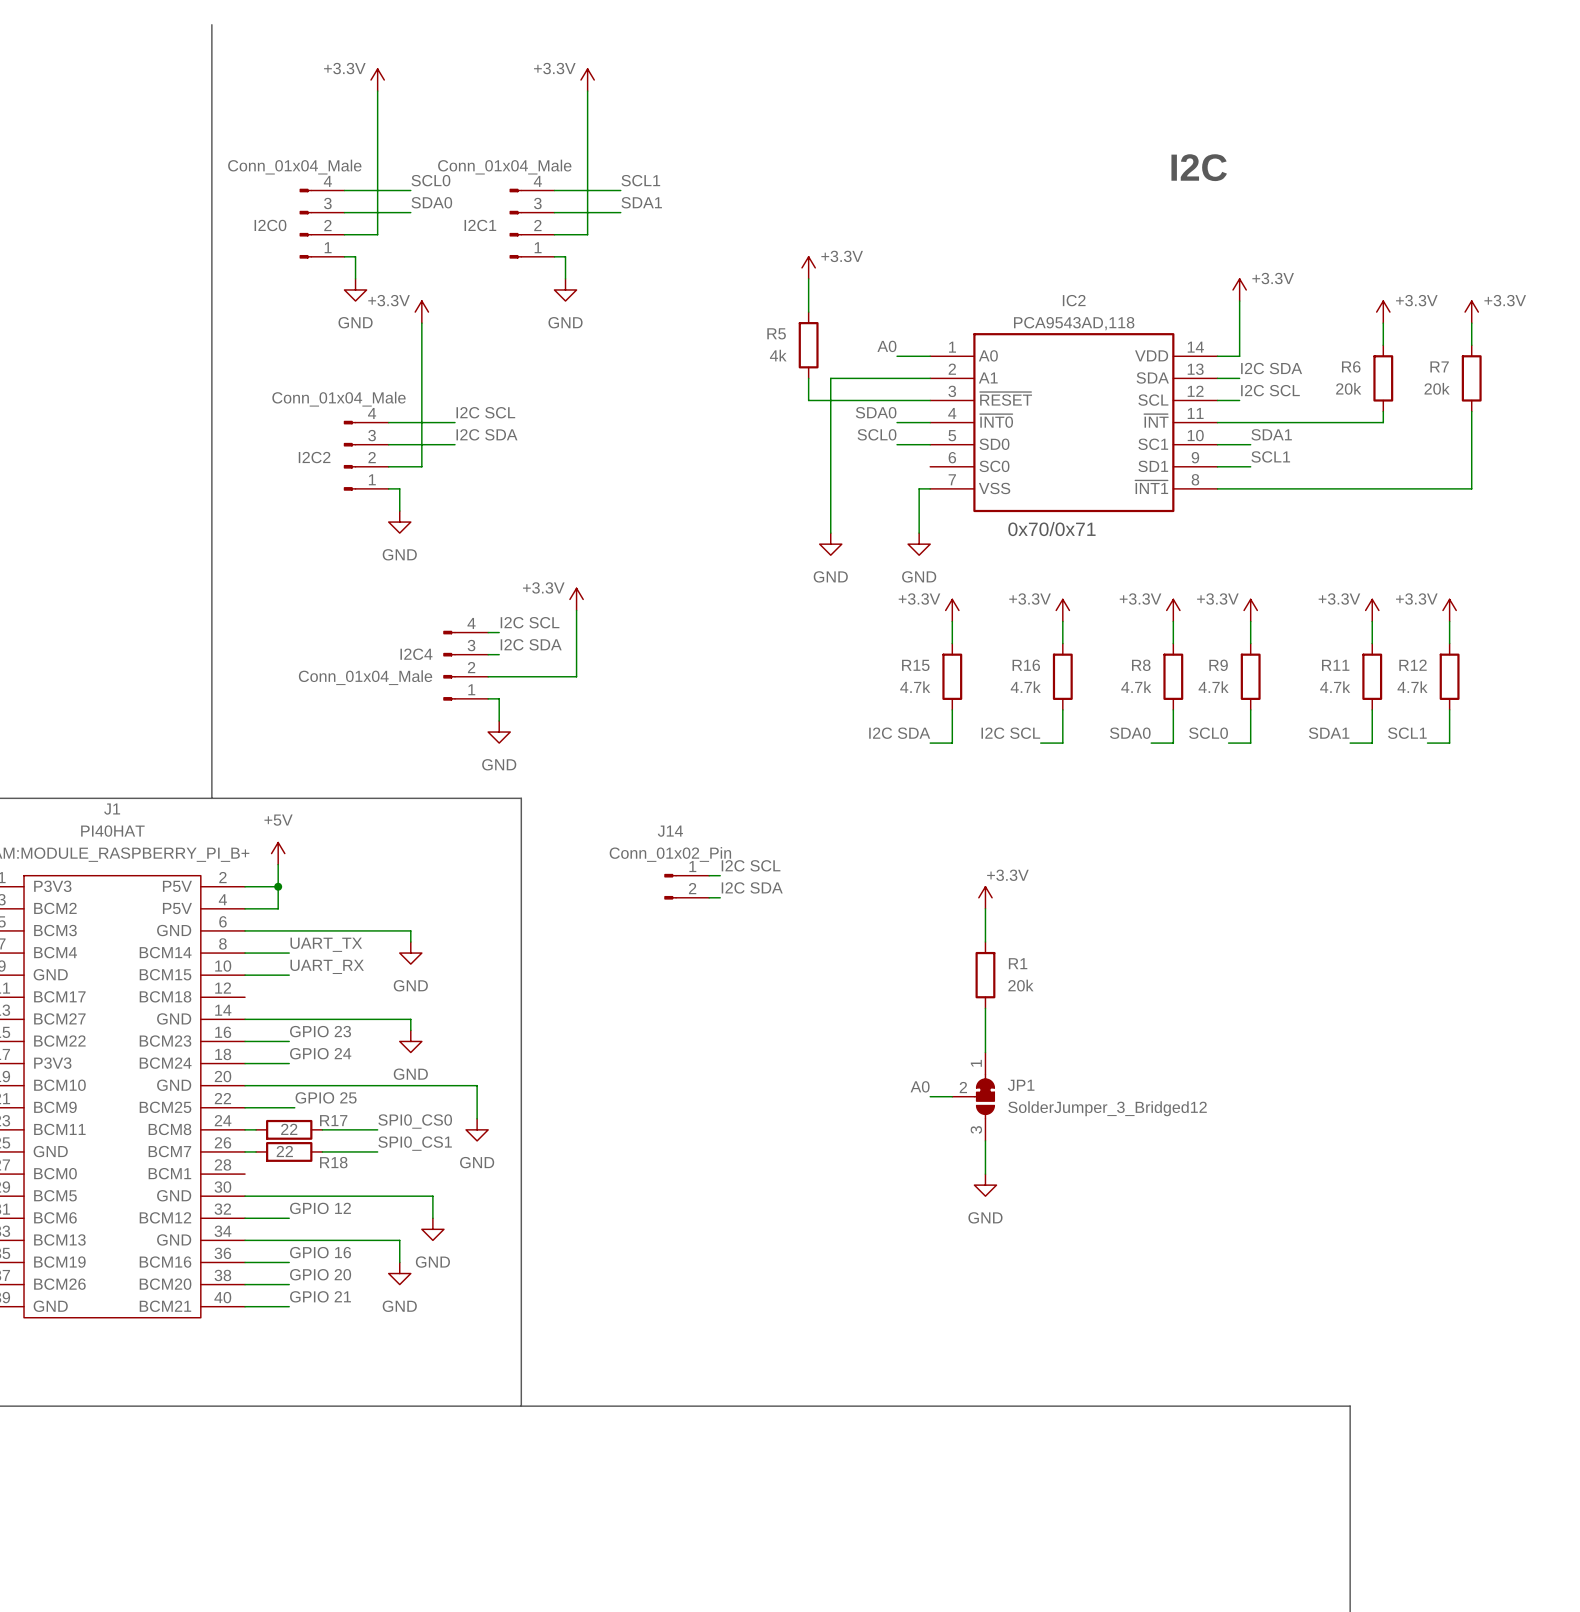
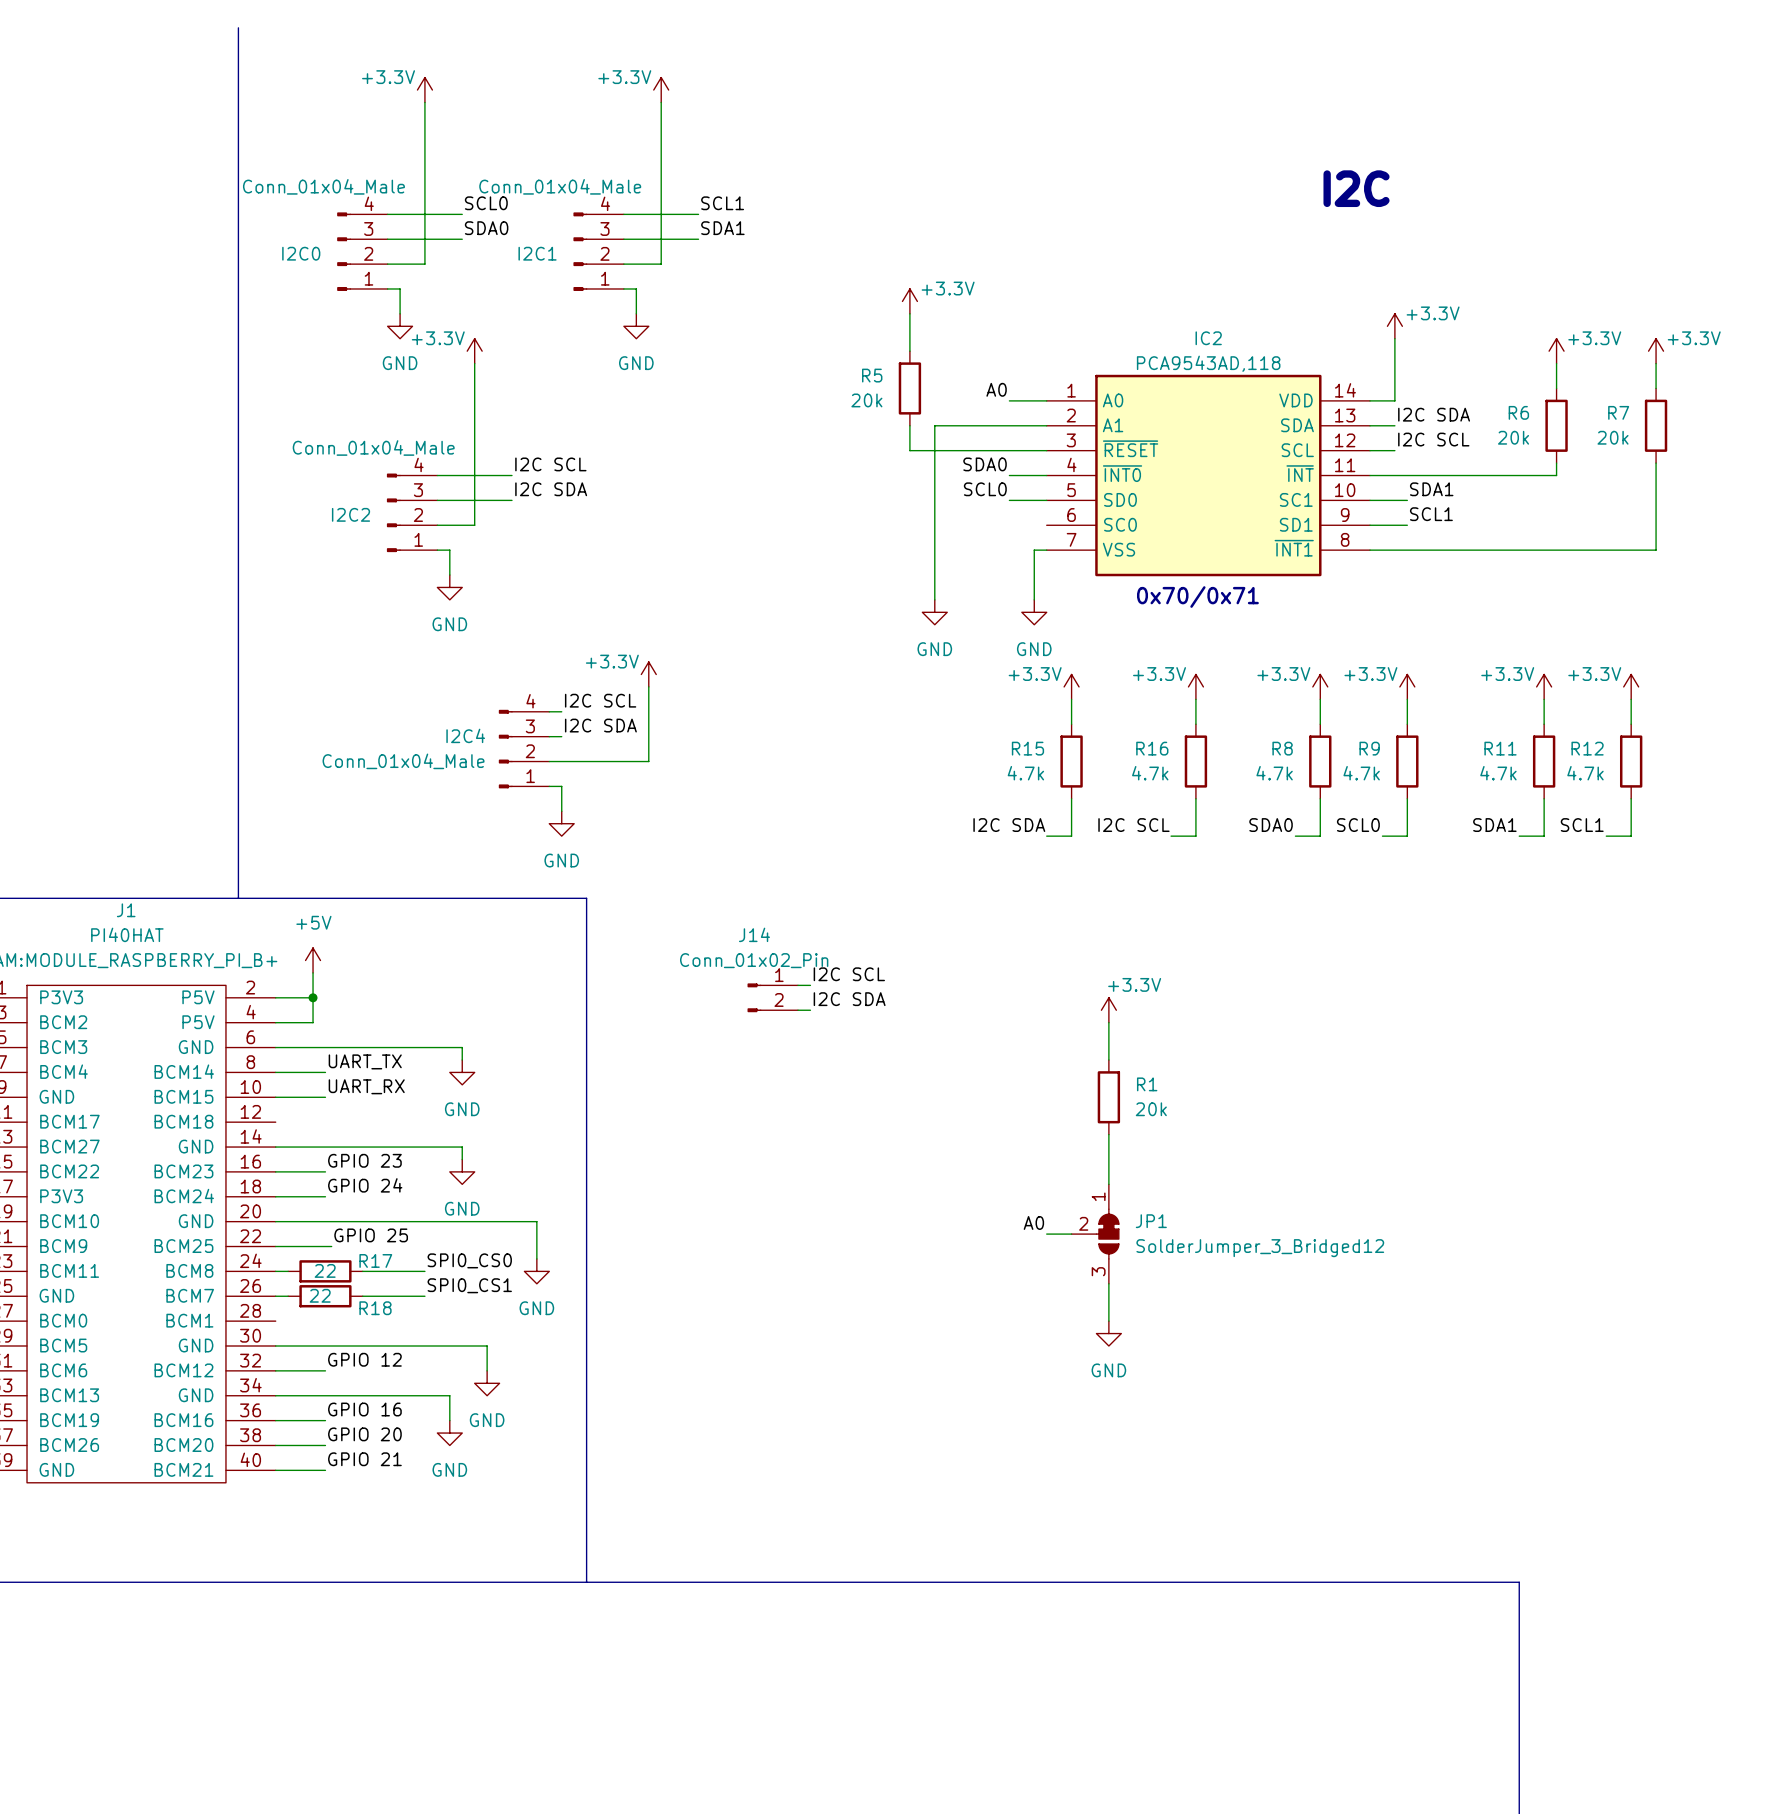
R5 value: 4k (778, 355) -> 20k (866, 400)

